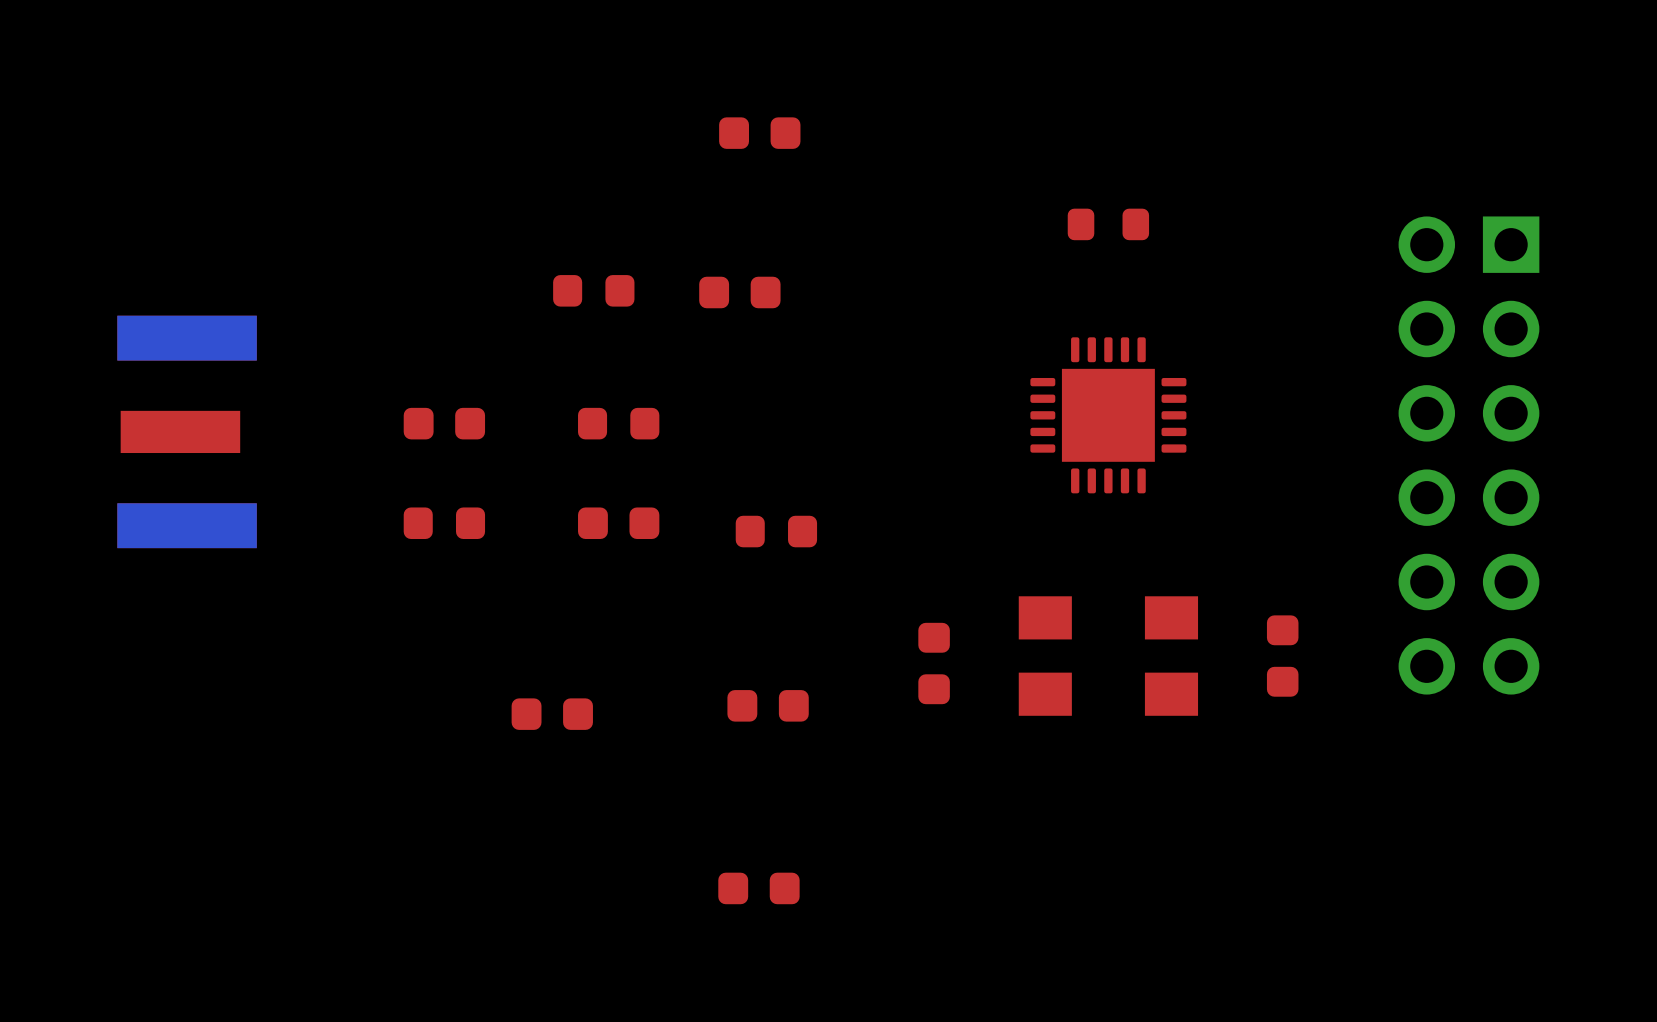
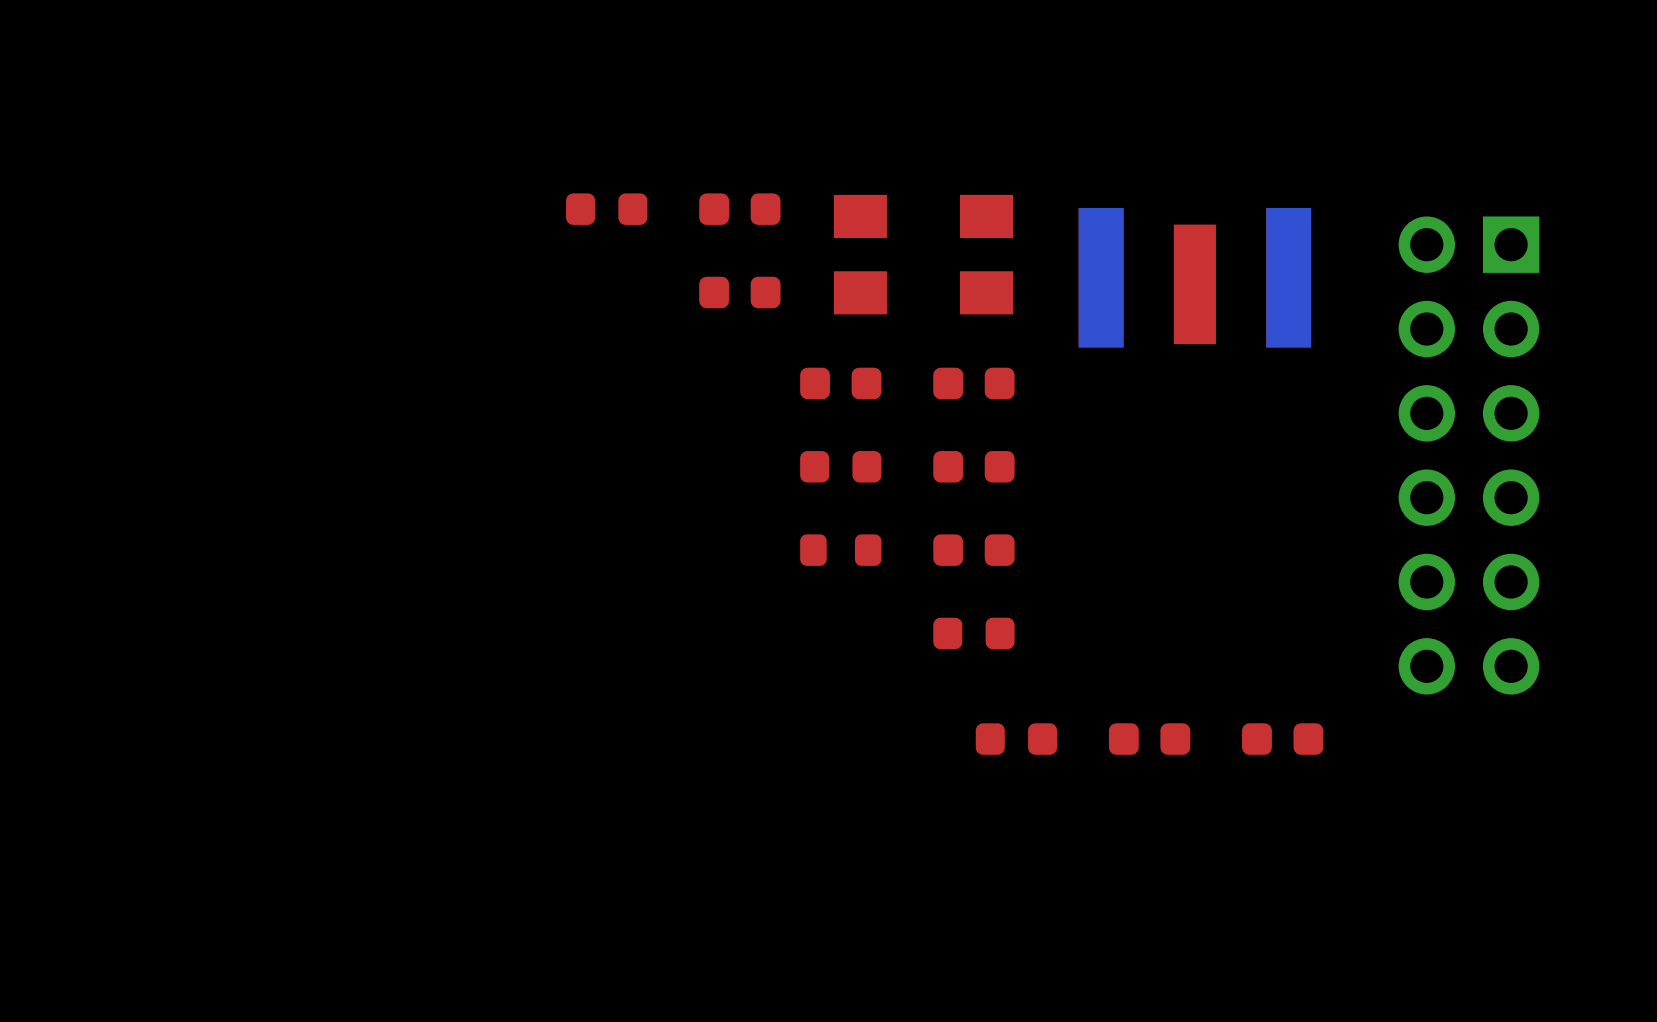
part position: (759, 133) -> (739, 209)
part position: (1108, 224) -> (840, 550)
part: none -> (1194, 277)
part position: (593, 290) -> (606, 209)
part: none -> (840, 383)
part: none -> (973, 383)
part: (1108, 415) -> none
part: (444, 423) -> none
part: (618, 423) -> none
part: (187, 431) -> none
part: none -> (973, 466)
part: (444, 523) -> none
part: (618, 523) -> none
part position: (776, 531) -> (840, 466)
part: none -> (973, 550)
part: none -> (973, 633)
part position: (1108, 656) -> (923, 254)
part: (1282, 656) -> none
part: (934, 663) -> none
part: (768, 705) -> none
part: (552, 714) -> none
part: none -> (1016, 739)
part: none -> (1149, 739)
part: none -> (1282, 739)
part: (758, 888) -> none

